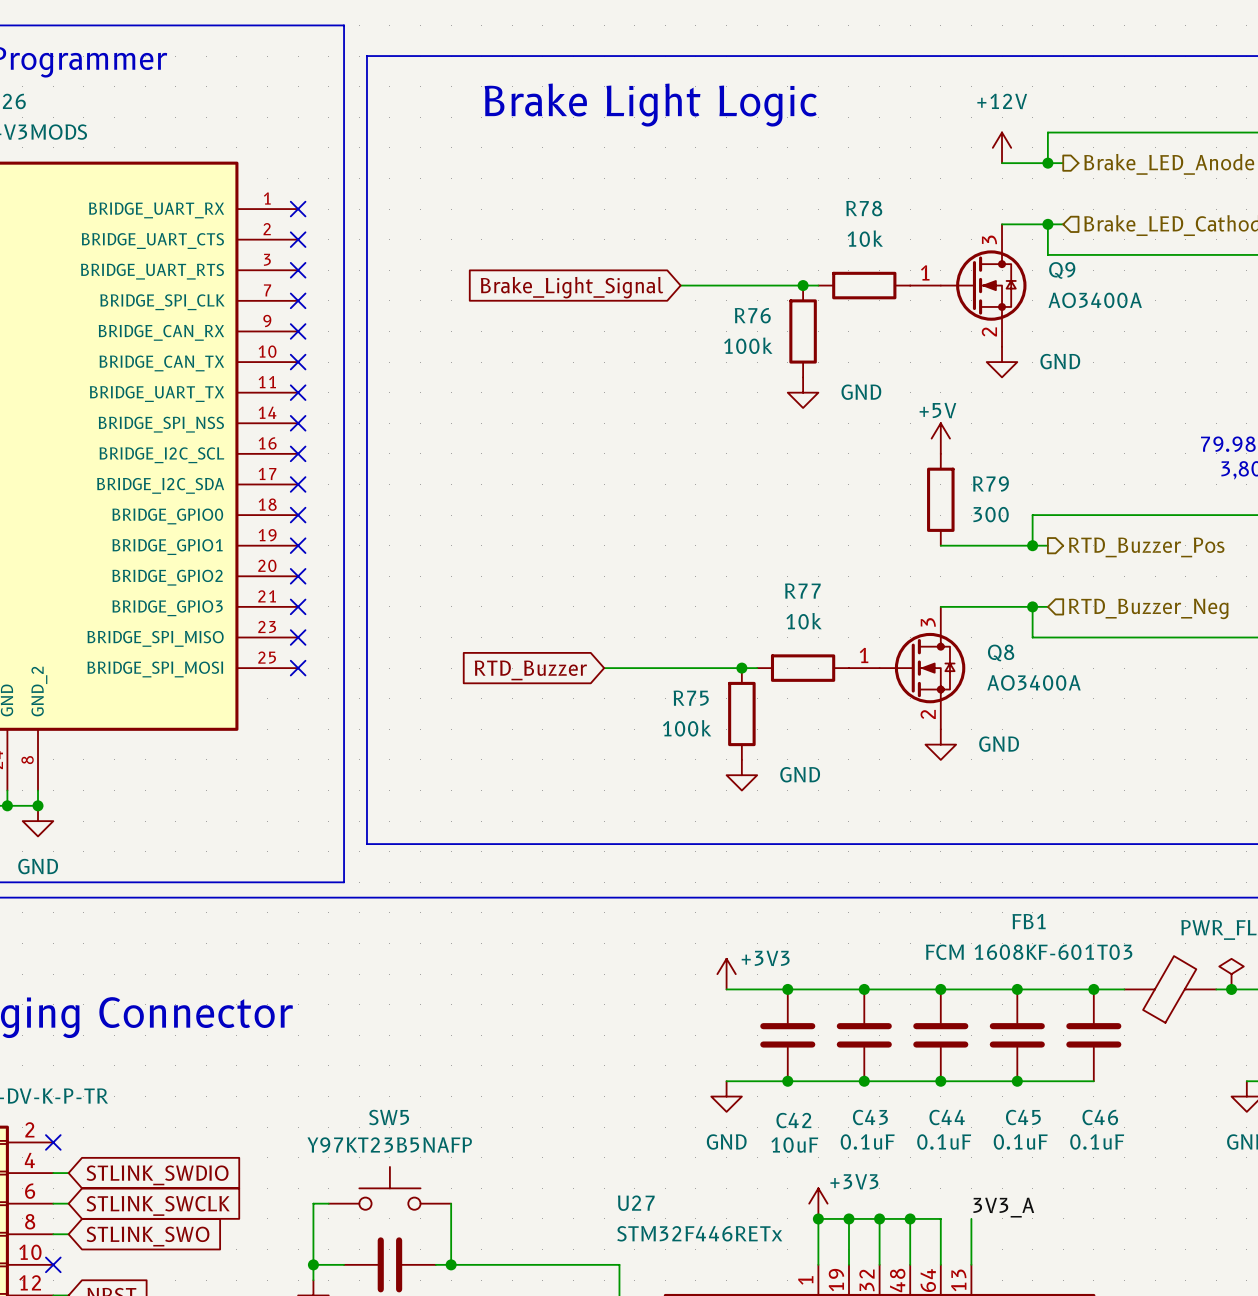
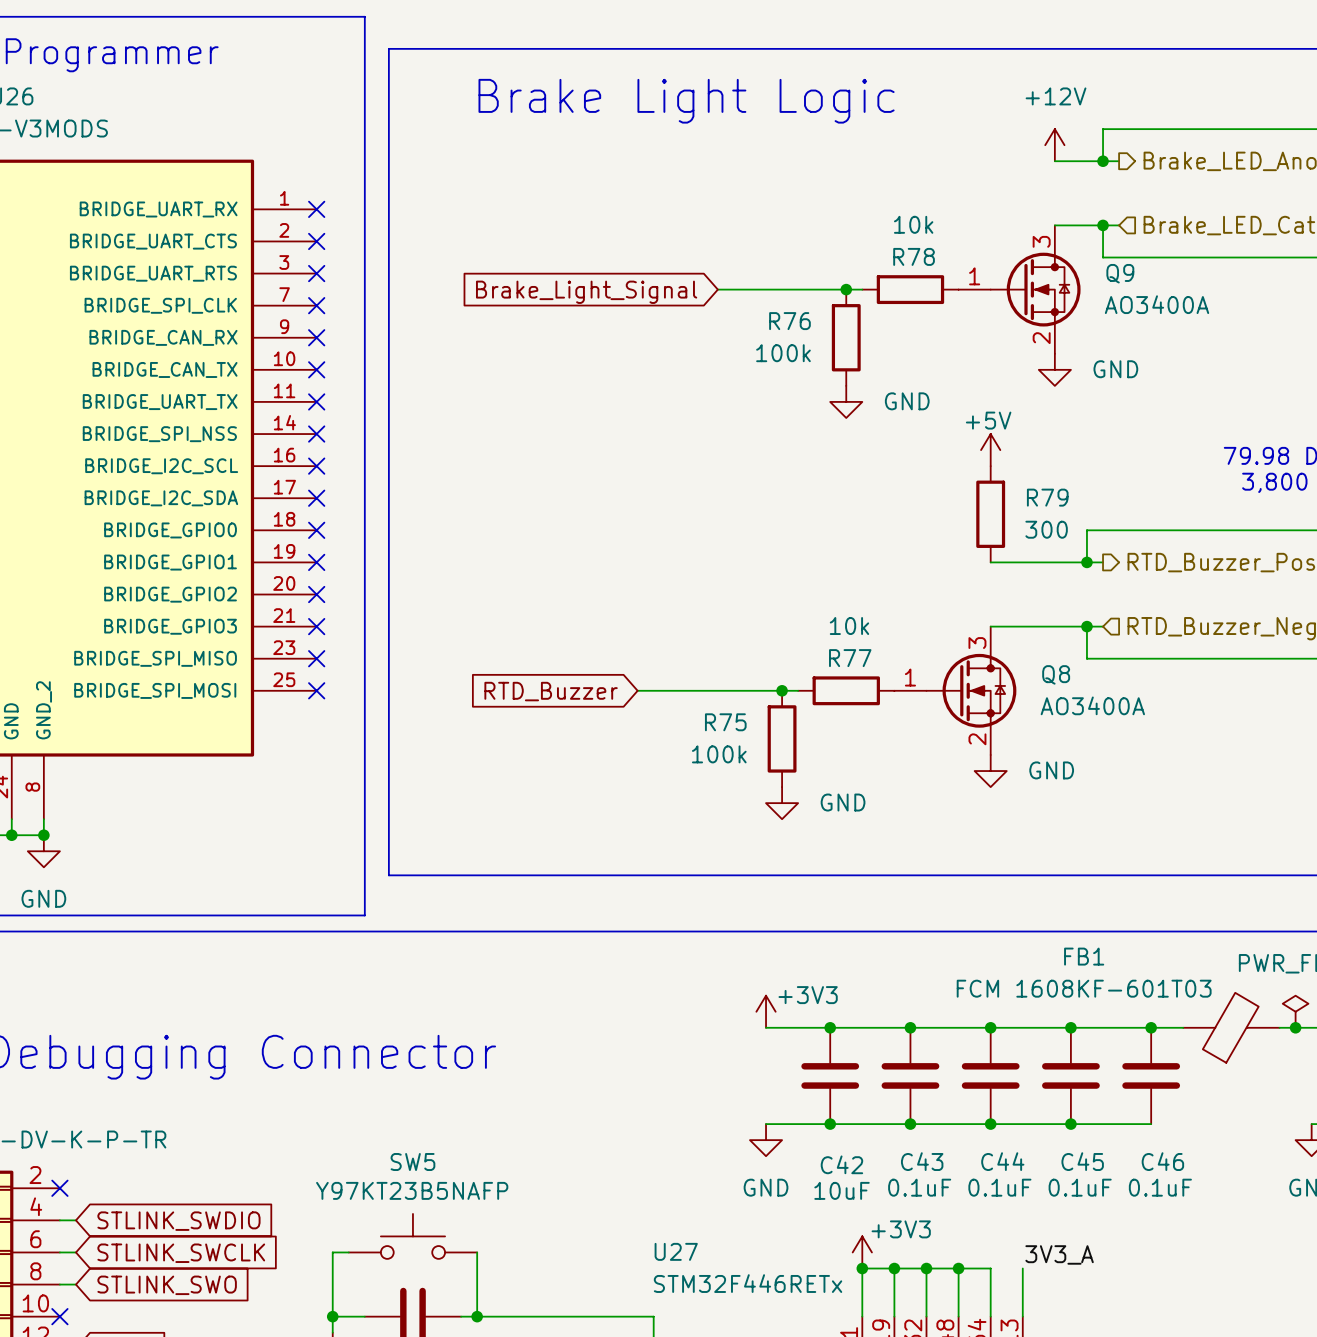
R78 name position: R78 (864, 208) -> R78 (914, 256)
R78 value position: 10k (865, 238) -> 10k (913, 224)
R77 name position: R77 (802, 591) -> R77 (850, 658)
R77 value position: 10k (804, 621) -> 10k (849, 626)

